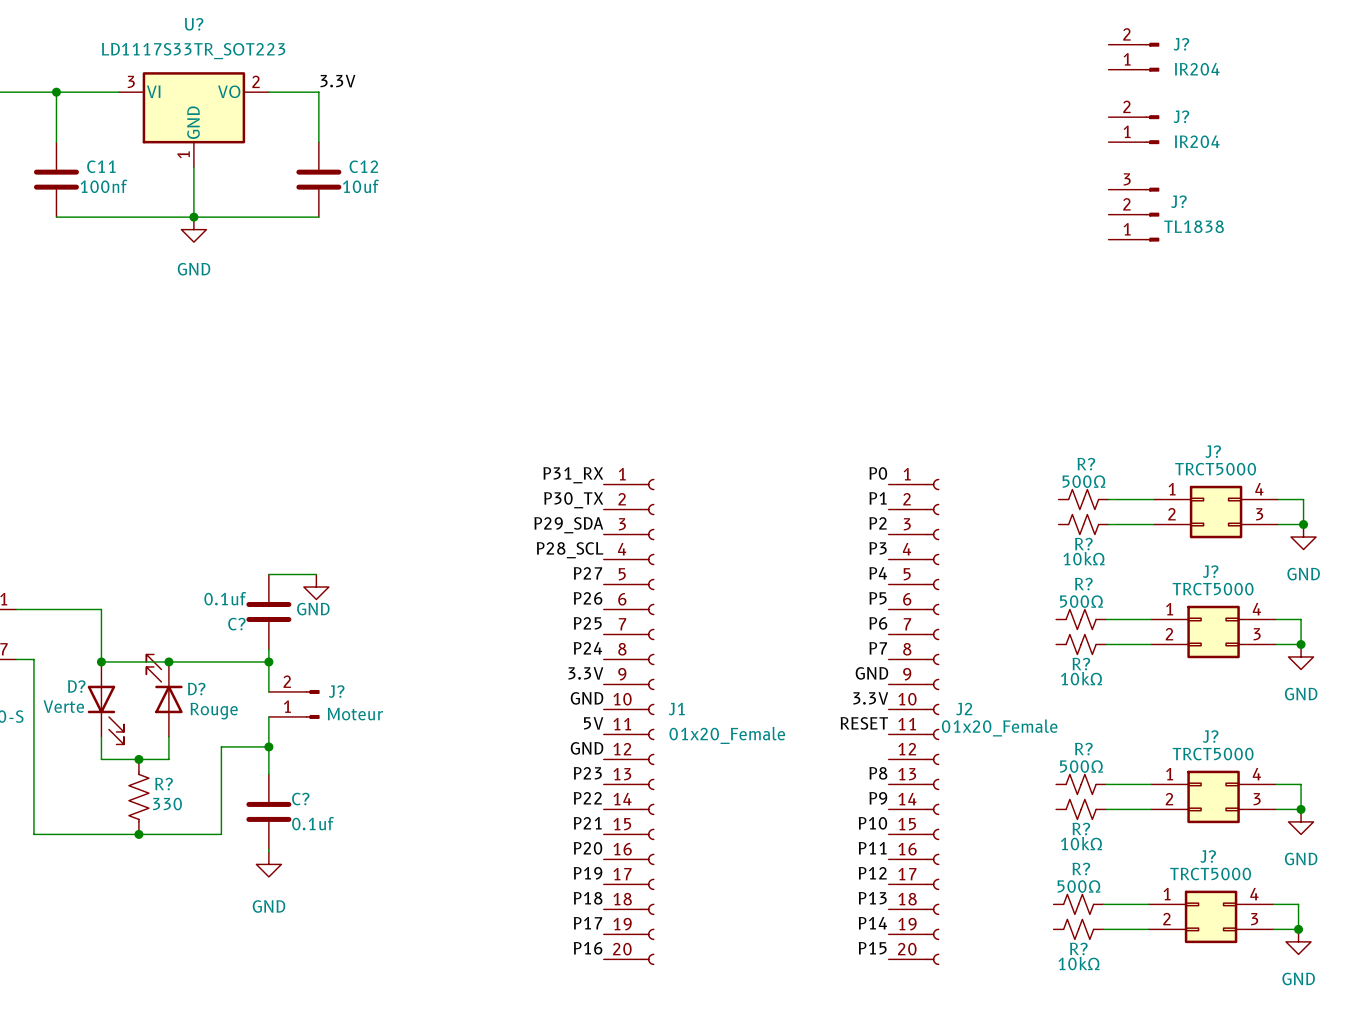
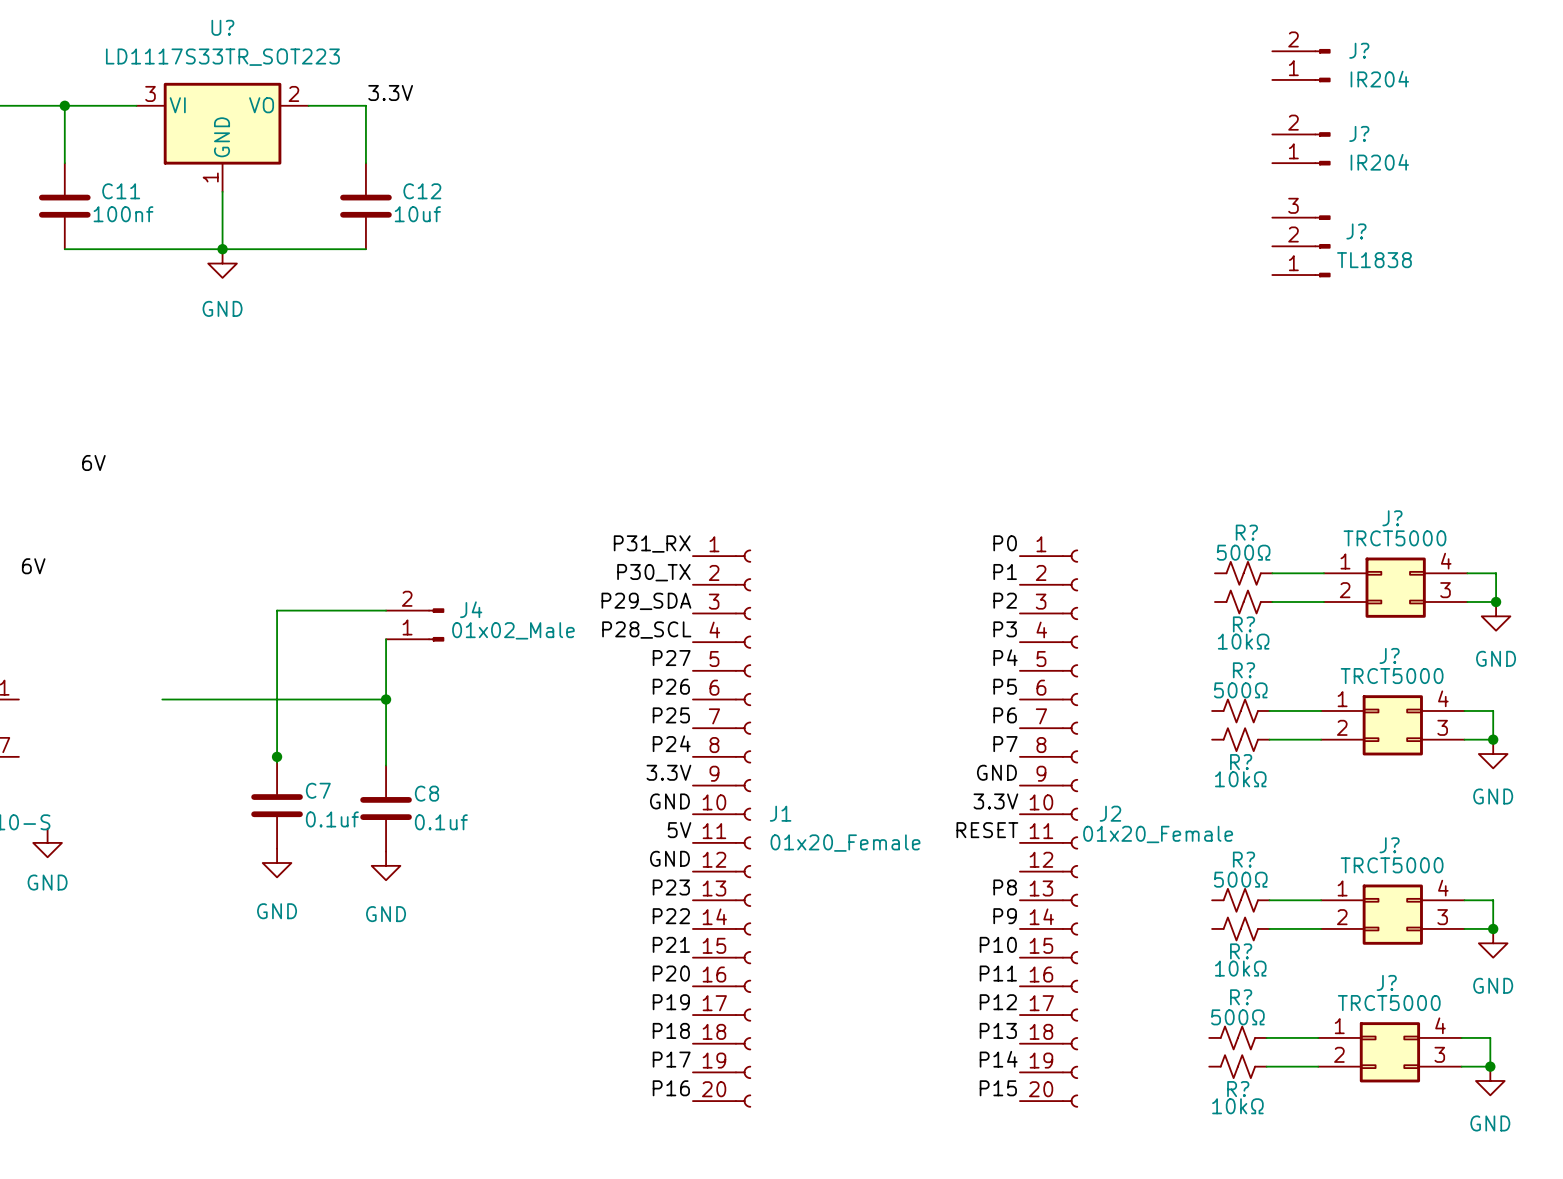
label: none -> 6V (93, 462)
label: none -> 6V (33, 566)
wire: none -> (386, 610) (277, 610) (277, 762)
J4: none -> 01x02_Male (415, 624)
wire: none -> (386, 639) (386, 765)
wire: (268, 574) (316, 574) -> none
power symbol: GND (316, 587) -> none
wire: (16, 609) (101, 609) (101, 661) (268, 661) -> none
wire: none -> (162, 699) (386, 699)
junction: none -> (386, 699)
C?: 0.1uf (268, 611) -> none
wire: (268, 649) (268, 691) -> none
wire: (16, 659) (33, 659) (33, 834) (221, 834) (221, 746) (268, 746) -> none
junction: (101, 661) -> none
junction: (168, 661) -> none
junction position: (268, 661) -> (277, 756)
D?: Rouge (164, 695) -> none
C7: none -> 0.1uf (277, 805)
D?: Verte (105, 703) -> none
J?: Moteur (294, 704) -> none
C8: none -> 0.1uf (386, 808)
wire: (268, 716) (268, 774) -> none
power symbol: none -> GND (47, 842)
wire: (101, 736) (101, 759) (168, 759) (168, 736) -> none
junction: (268, 746) -> none
power symbol: none -> GND (277, 863)
power symbol: none -> GND (386, 865)
junction: (138, 759) -> none
R?: 330 (138, 796) -> none
C?: 0.1uf (268, 811) -> none
junction: (138, 834) -> none
wire: (268, 849) (268, 851) -> none
power symbol: GND (268, 864) -> none

